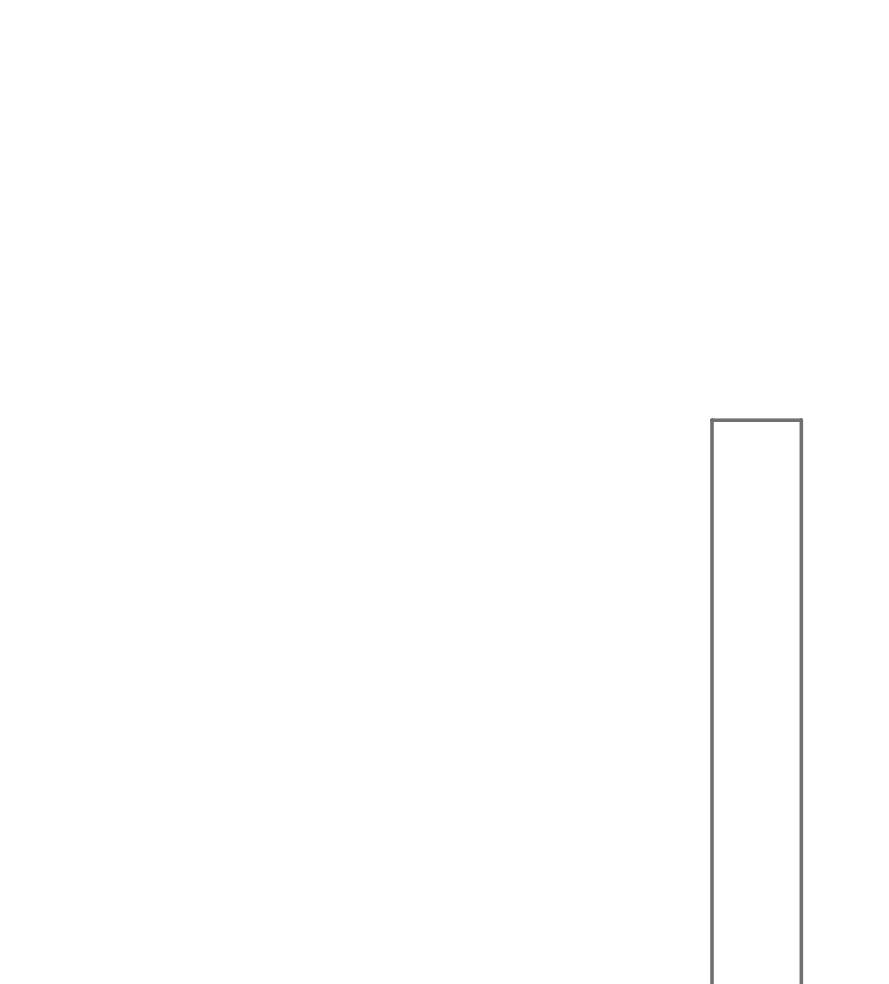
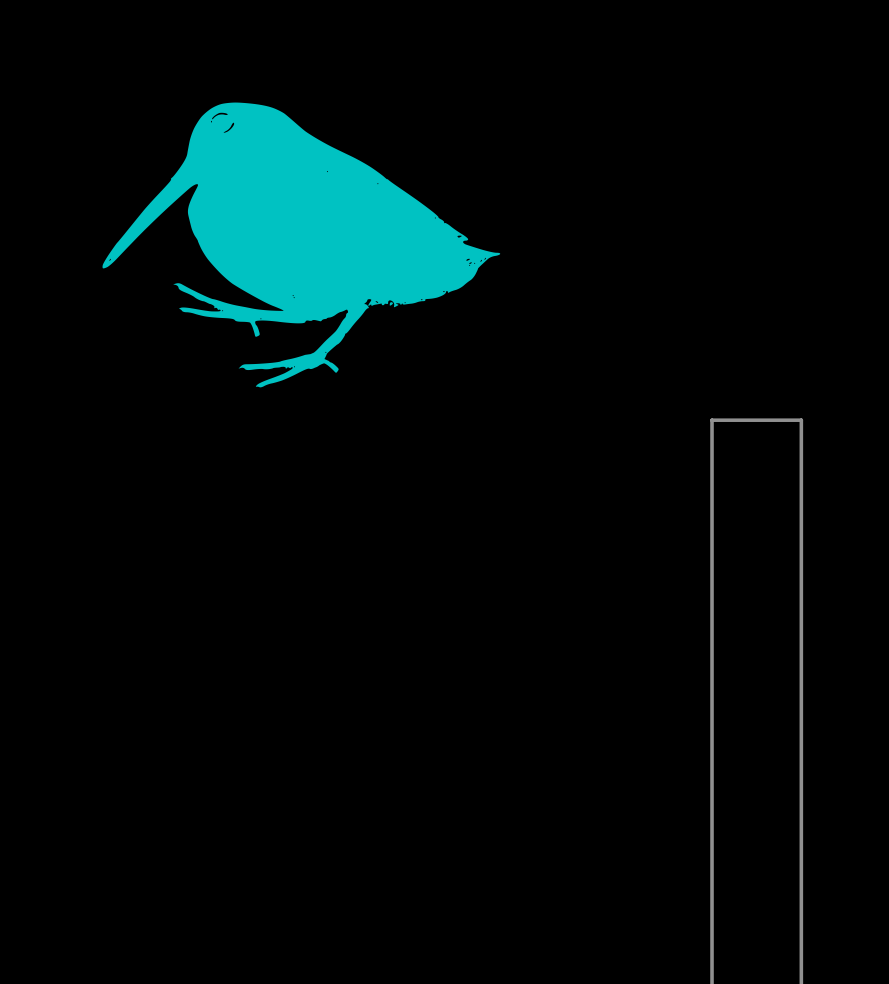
drawing: none -> [102, 102, 501, 388]

